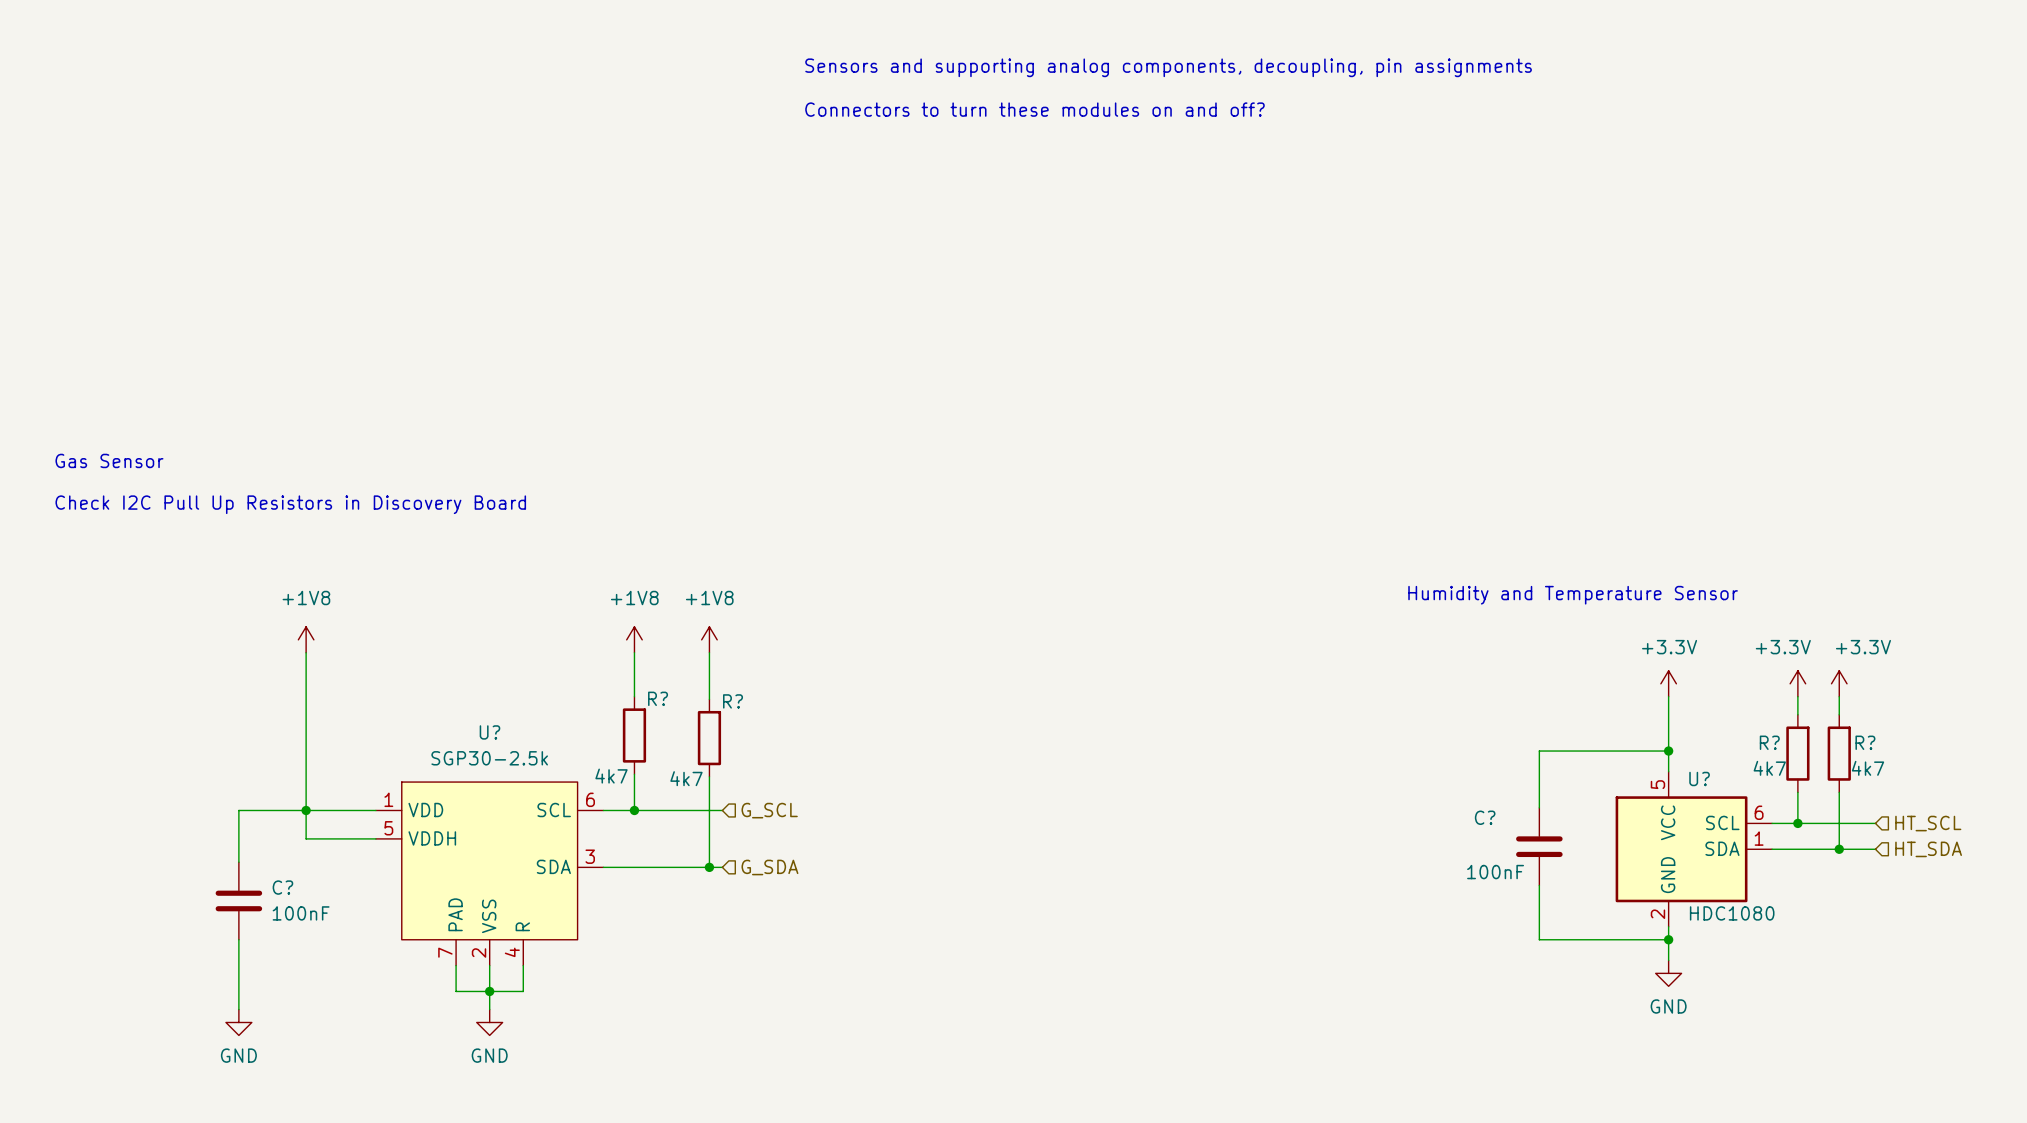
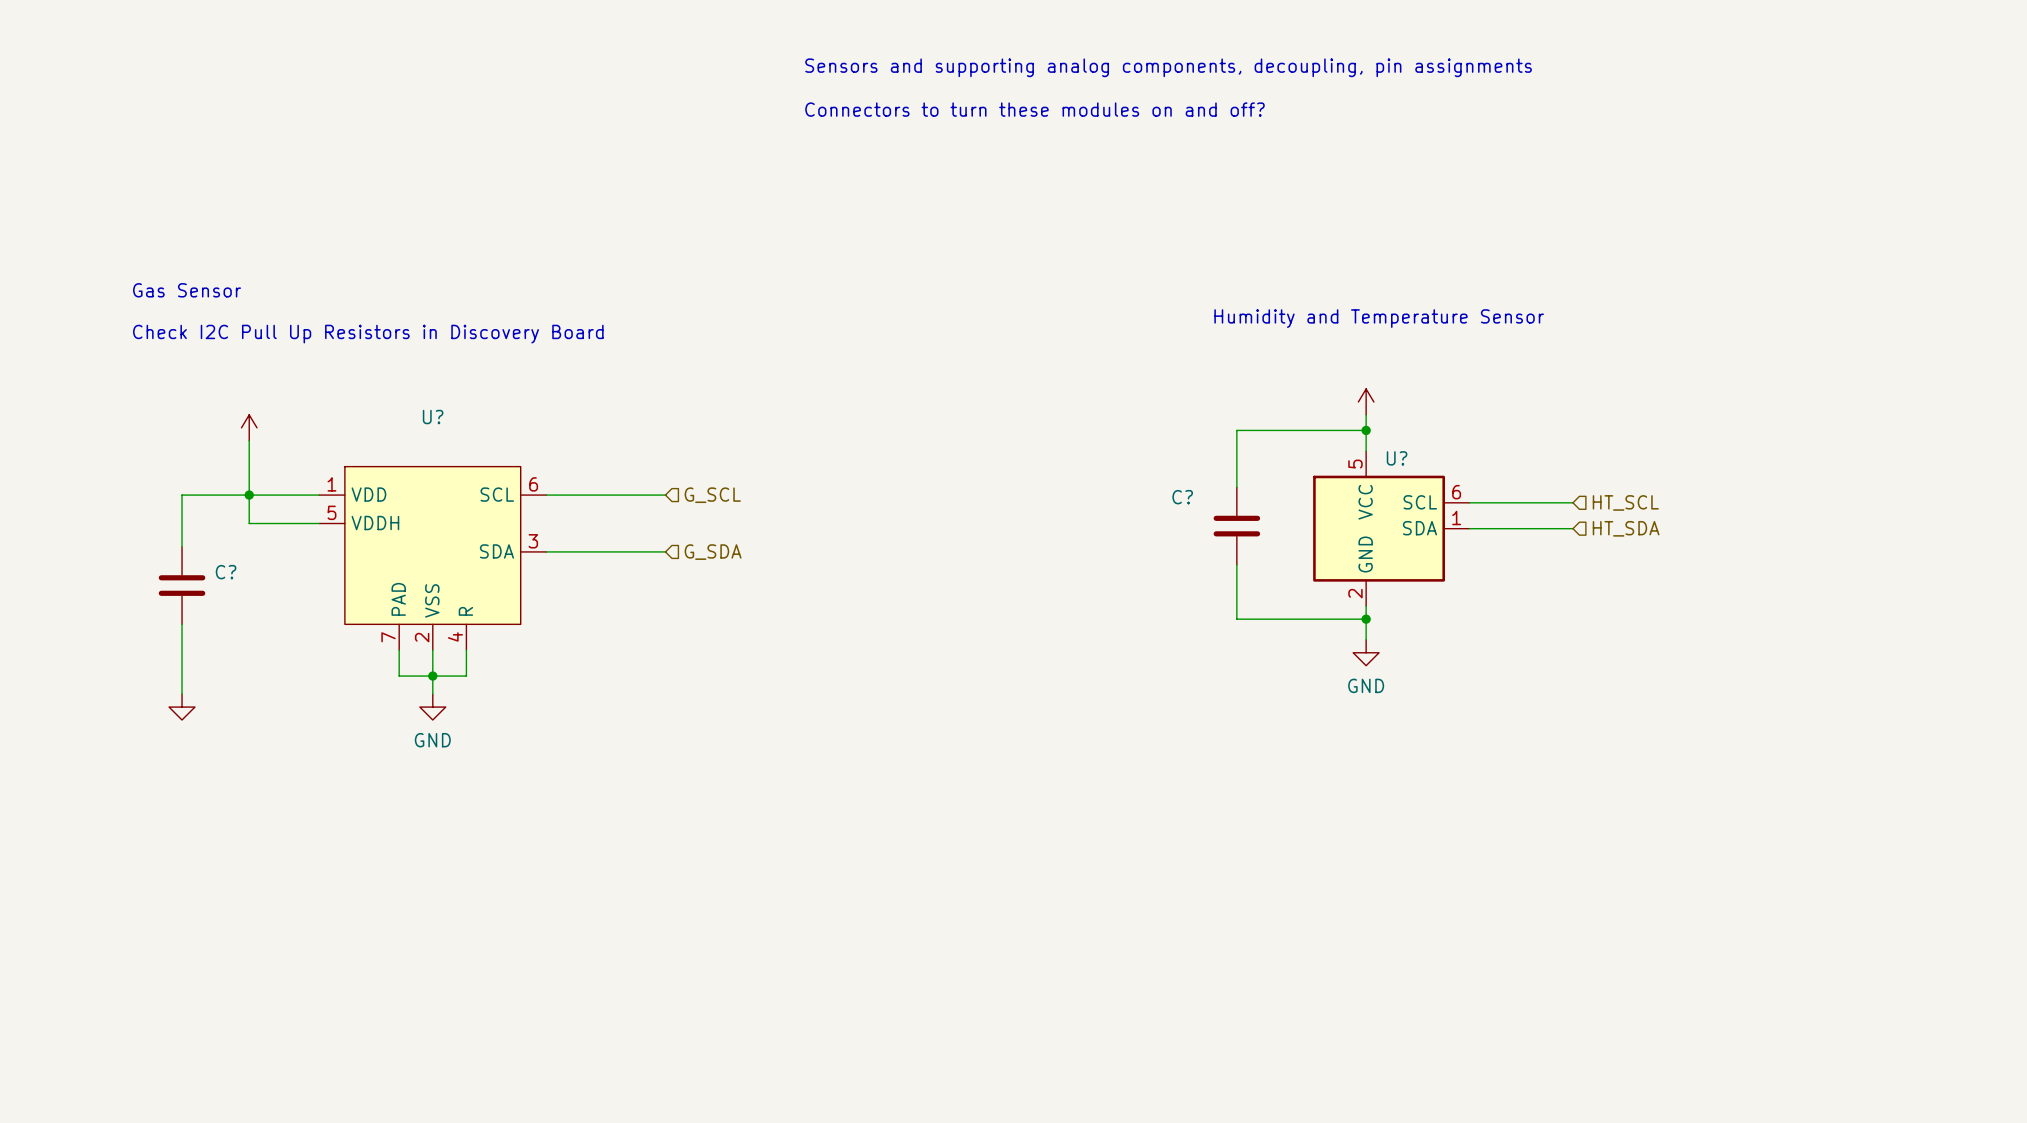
text: none -> Humidity and Temperature Sensor (1379, 318)
power symbol: none -> (1366, 401)
wire: none -> (1366, 414) (1366, 451)
power symbol: none -> (249, 427)
wire: none -> (1366, 430) (1236, 430) (1236, 487)
junction: none -> (1366, 430)
wire: none -> (249, 440) (249, 523) (319, 523)
text position: Gas Sensor (109, 460) -> Gas Sensor (187, 290)
junction: none -> (249, 495)
wire: none -> (319, 495) (182, 495) (182, 546)
wire: none -> (546, 495) (665, 495)
hierarchical label: none -> G_SCL (712, 495)
wire: none -> (1469, 502) (1572, 502)
hierarchical label: none -> HT_SCL (1625, 502)
text position: Check I2C Pull Up Resistors in Discovery Board (290, 504) -> Check I2C Pull Up Resistors in Discovery Board (368, 334)
C?: none -> (1236, 526)
U?: none -> (1391, 528)
wire: none -> (1469, 528) (1572, 528)
hierarchical label: none -> HT_SDA (1626, 528)
wire: none -> (546, 551) (665, 551)
hierarchical label: none -> G_SDA (713, 552)
U?: none -> (432, 558)
wire: none -> (1236, 564) (1236, 619) (1366, 619)
C?: none -> (182, 585)
text: Humidity and Temperature Sensor (1573, 595) -> none
wire: none -> (1366, 606) (1366, 639)
junction: none -> (1366, 619)
wire: none -> (182, 624) (182, 694)
power symbol: +1V8 (306, 639) -> none
power symbol: +1V8 (634, 639) -> none
power symbol: +1V8 (709, 639) -> none
wire: none -> (399, 650) (399, 676) (466, 676) (466, 650)
wire: (306, 652) (306, 838) (375, 838) -> none
wire: (634, 652) (634, 696) -> (432, 650) (432, 694)
wire: (709, 652) (709, 699) -> none
power symbol: none -> GND (1366, 652)
junction: none -> (432, 676)
power symbol: +3.3V (1668, 683) -> none
power symbol: +3.3V (1797, 683) -> none
power symbol: +3.3V (1839, 683) -> none
wire: (1668, 696) (1668, 771) -> none
wire: (1797, 696) (1797, 714) -> none
wire: (1839, 696) (1839, 714) -> none
power symbol: none -> (182, 707)
power symbol: none -> GND (432, 707)
R?: 4k7 (634, 735) -> none
R?: 4k7 (709, 738) -> none
wire: (1668, 751) (1539, 751) (1539, 807) -> none
junction: (1668, 751) -> none
R?: 4k7 (1797, 753) -> none
R?: 4k7 (1839, 753) -> none
wire: (634, 774) (634, 810) -> none
wire: (709, 776) (709, 867) -> none
wire: (1797, 792) (1797, 823) -> none
wire: (1839, 792) (1839, 849) -> none
junction: (306, 810) -> none
wire: (375, 810) (238, 810) (238, 862) -> none
wire: (603, 810) (722, 810) -> none
junction: (634, 810) -> none
hierarchical label: G_SCL (769, 810) -> none
wire: (1772, 823) (1875, 823) -> none
junction: (1797, 823) -> none
hierarchical label: HT_SCL (1928, 823) -> none
C?: 100nF (1539, 846) -> none
U?: HDC1080 (1693, 849) -> none
wire: (1772, 849) (1875, 849) -> none
junction: (1839, 849) -> none
hierarchical label: HT_SDA (1928, 849) -> none
wire: (603, 867) (722, 867) -> none
junction: (709, 867) -> none
hierarchical label: G_SDA (769, 867) -> none
U?: SGP30-2.5k (489, 873) -> none
wire: (1539, 885) (1539, 939) (1668, 939) -> none
C?: 100nF (238, 900) -> none
wire: (1668, 926) (1668, 960) -> none
wire: (238, 939) (238, 1009) -> none
junction: (1668, 939) -> none
wire: (456, 965) (456, 991) (523, 991) (523, 965) -> none
wire: (489, 965) (489, 1009) -> none
power symbol: GND (1668, 973) -> none
junction: (489, 991) -> none
power symbol: GND (238, 1022) -> none
power symbol: GND (489, 1022) -> none

